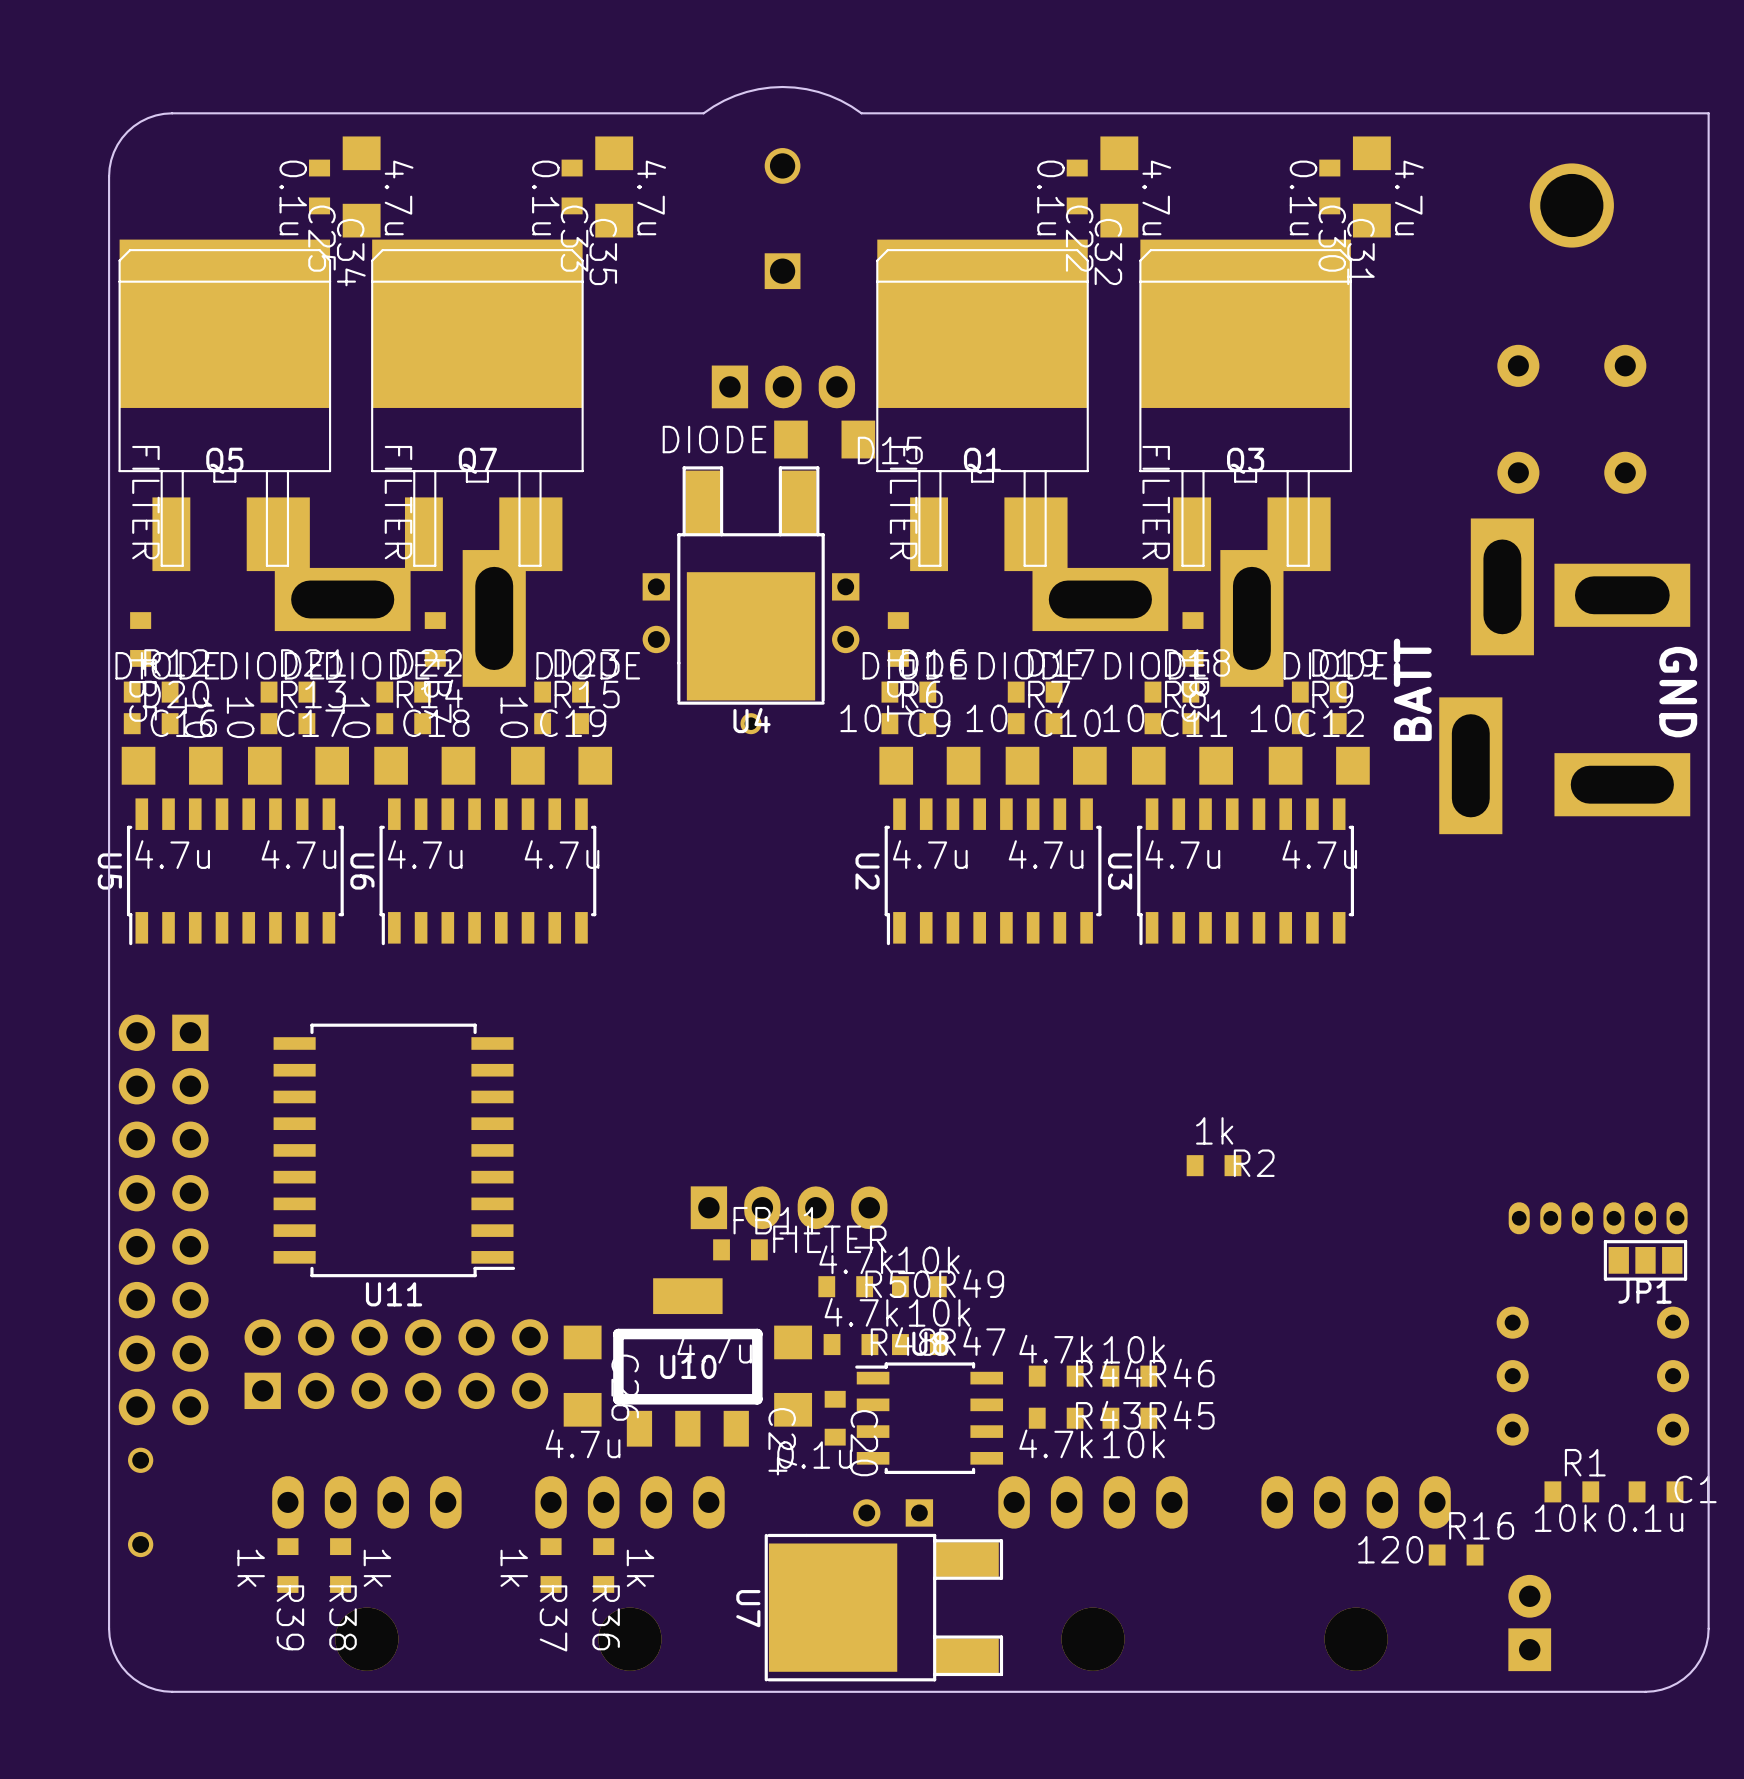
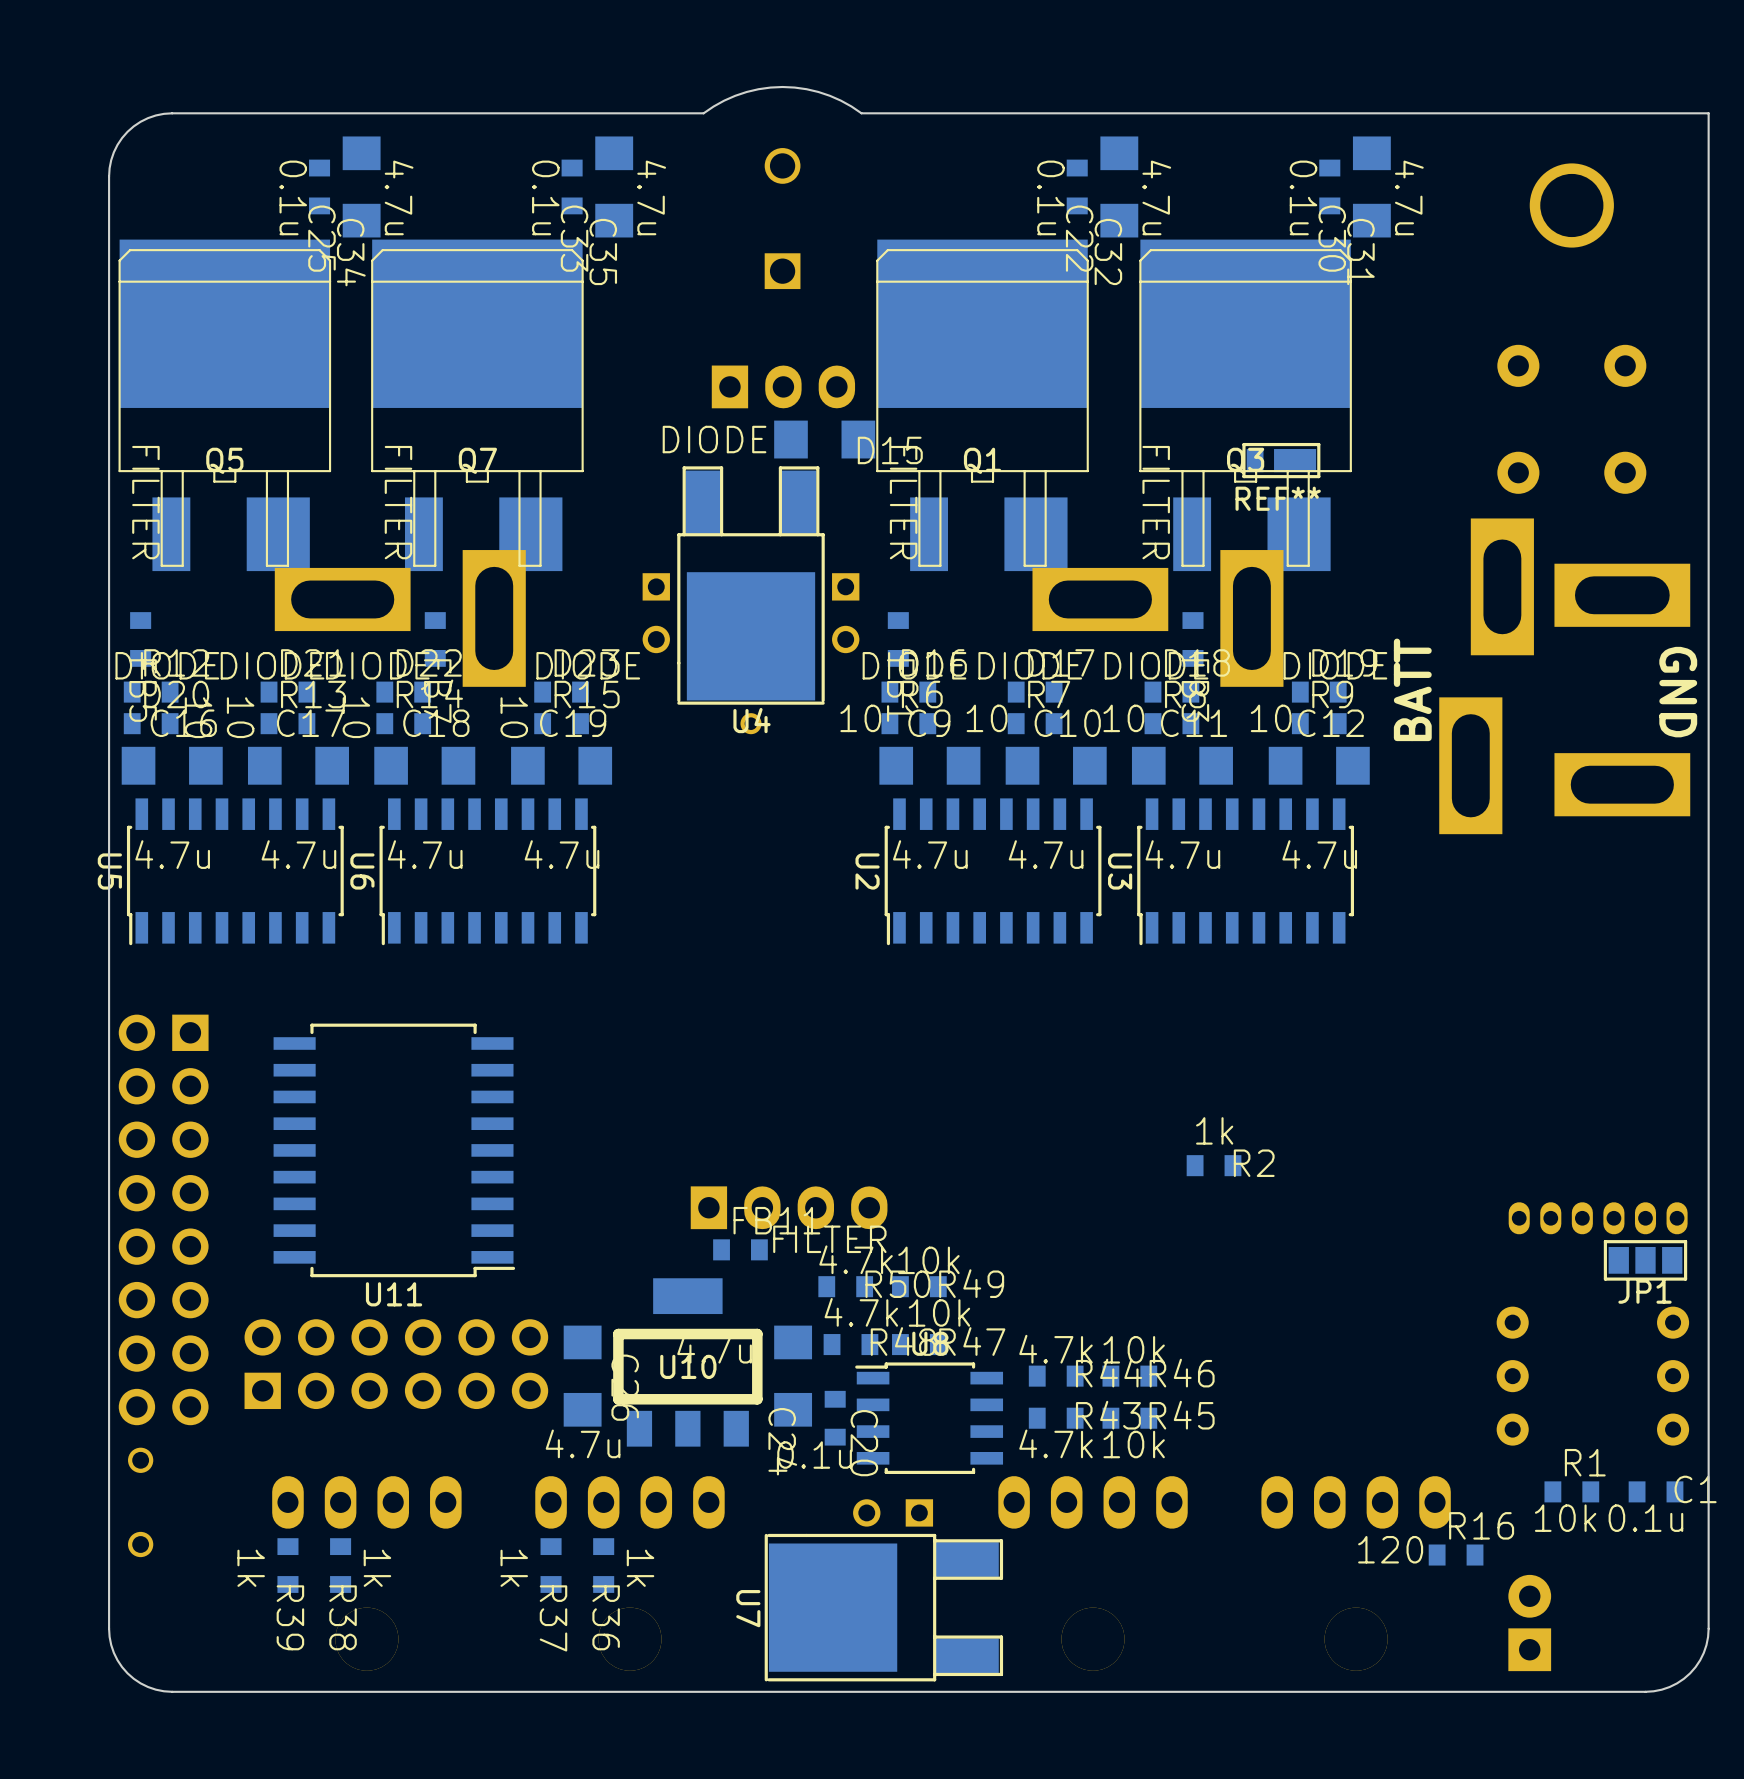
REF**: none -> (1281, 460)

